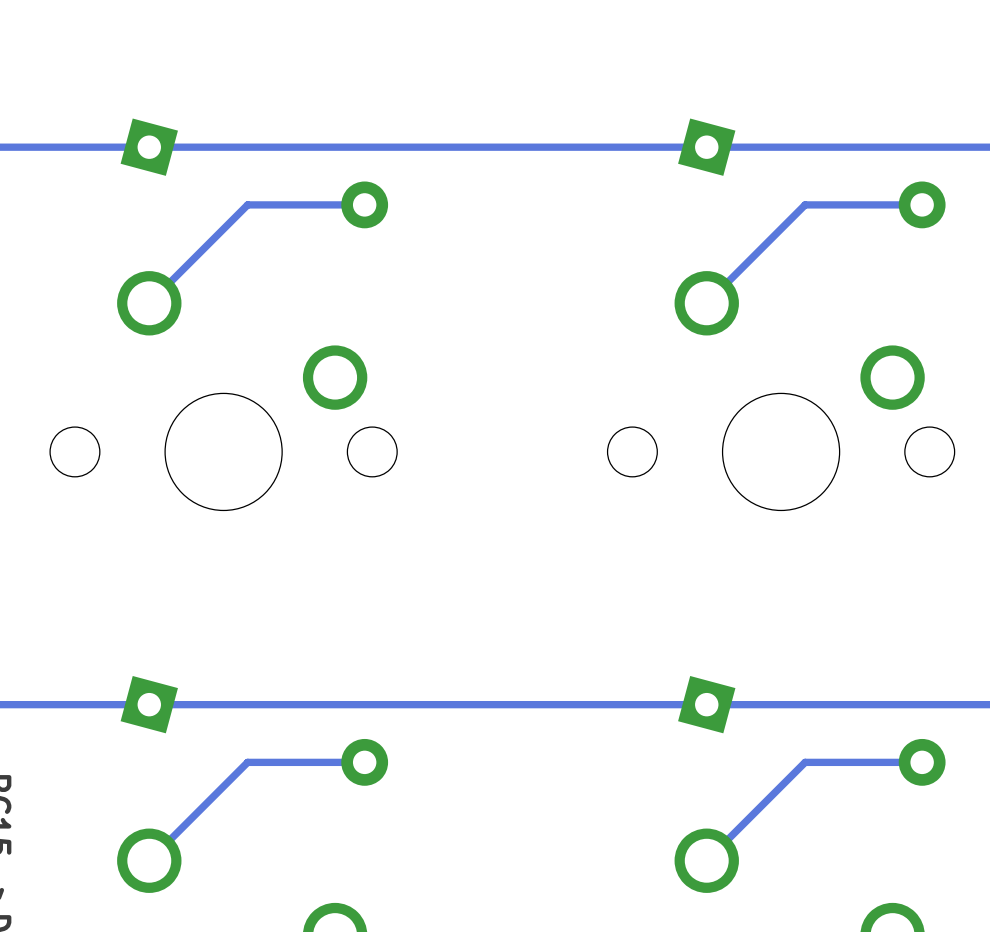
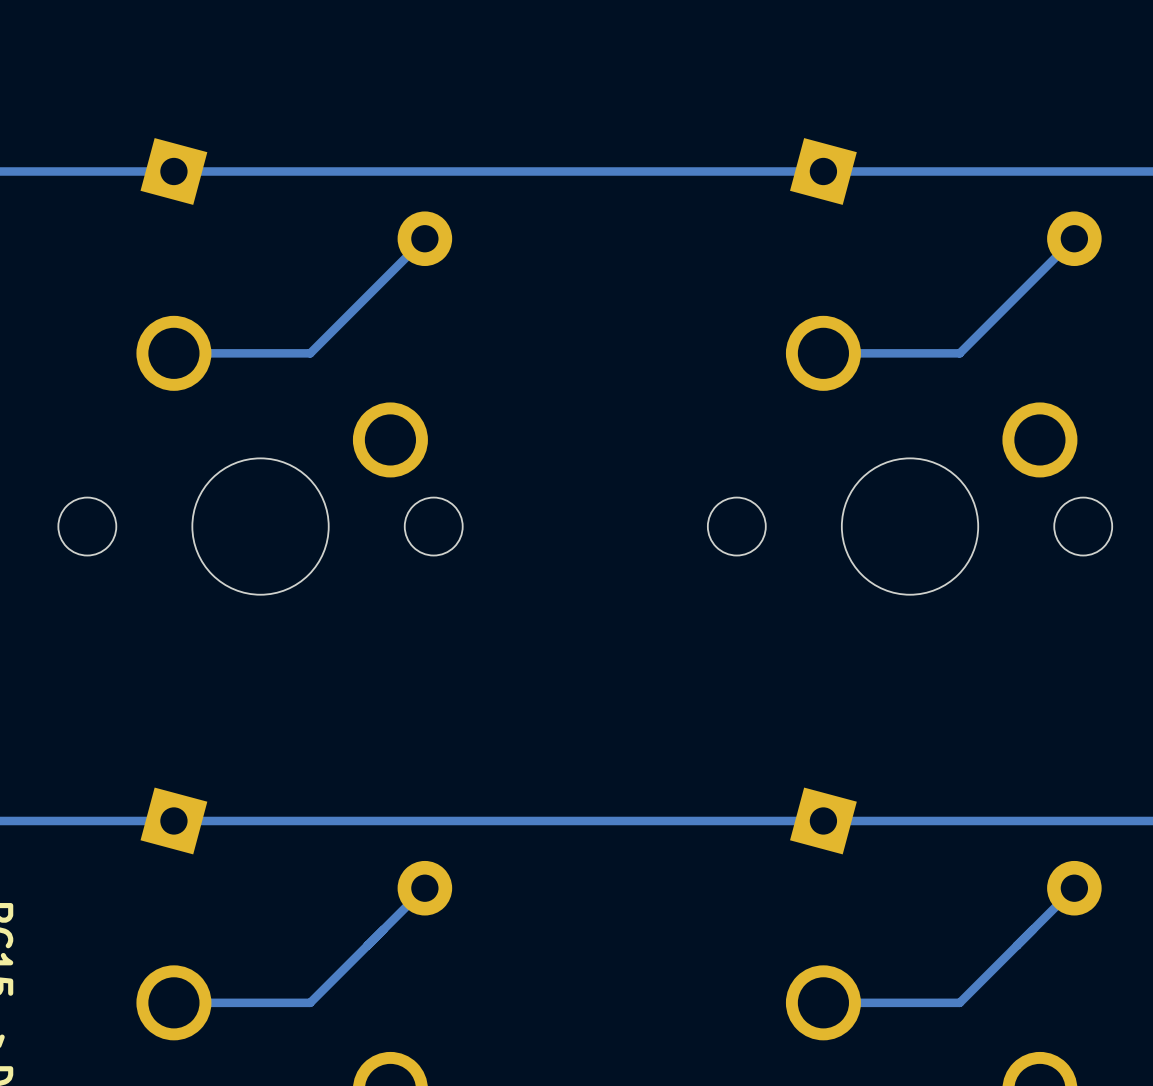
track: (364, 204) (247, 204) (149, 303) -> (424, 238) (310, 353) (173, 353)
track: (922, 204) (805, 204) (706, 303) -> (1074, 238) (959, 353) (823, 353)
track: (364, 762) (247, 762) (149, 860) -> (424, 888) (310, 1002) (173, 1002)
track: (922, 762) (805, 762) (706, 860) -> (1074, 888) (959, 1002) (823, 1002)

